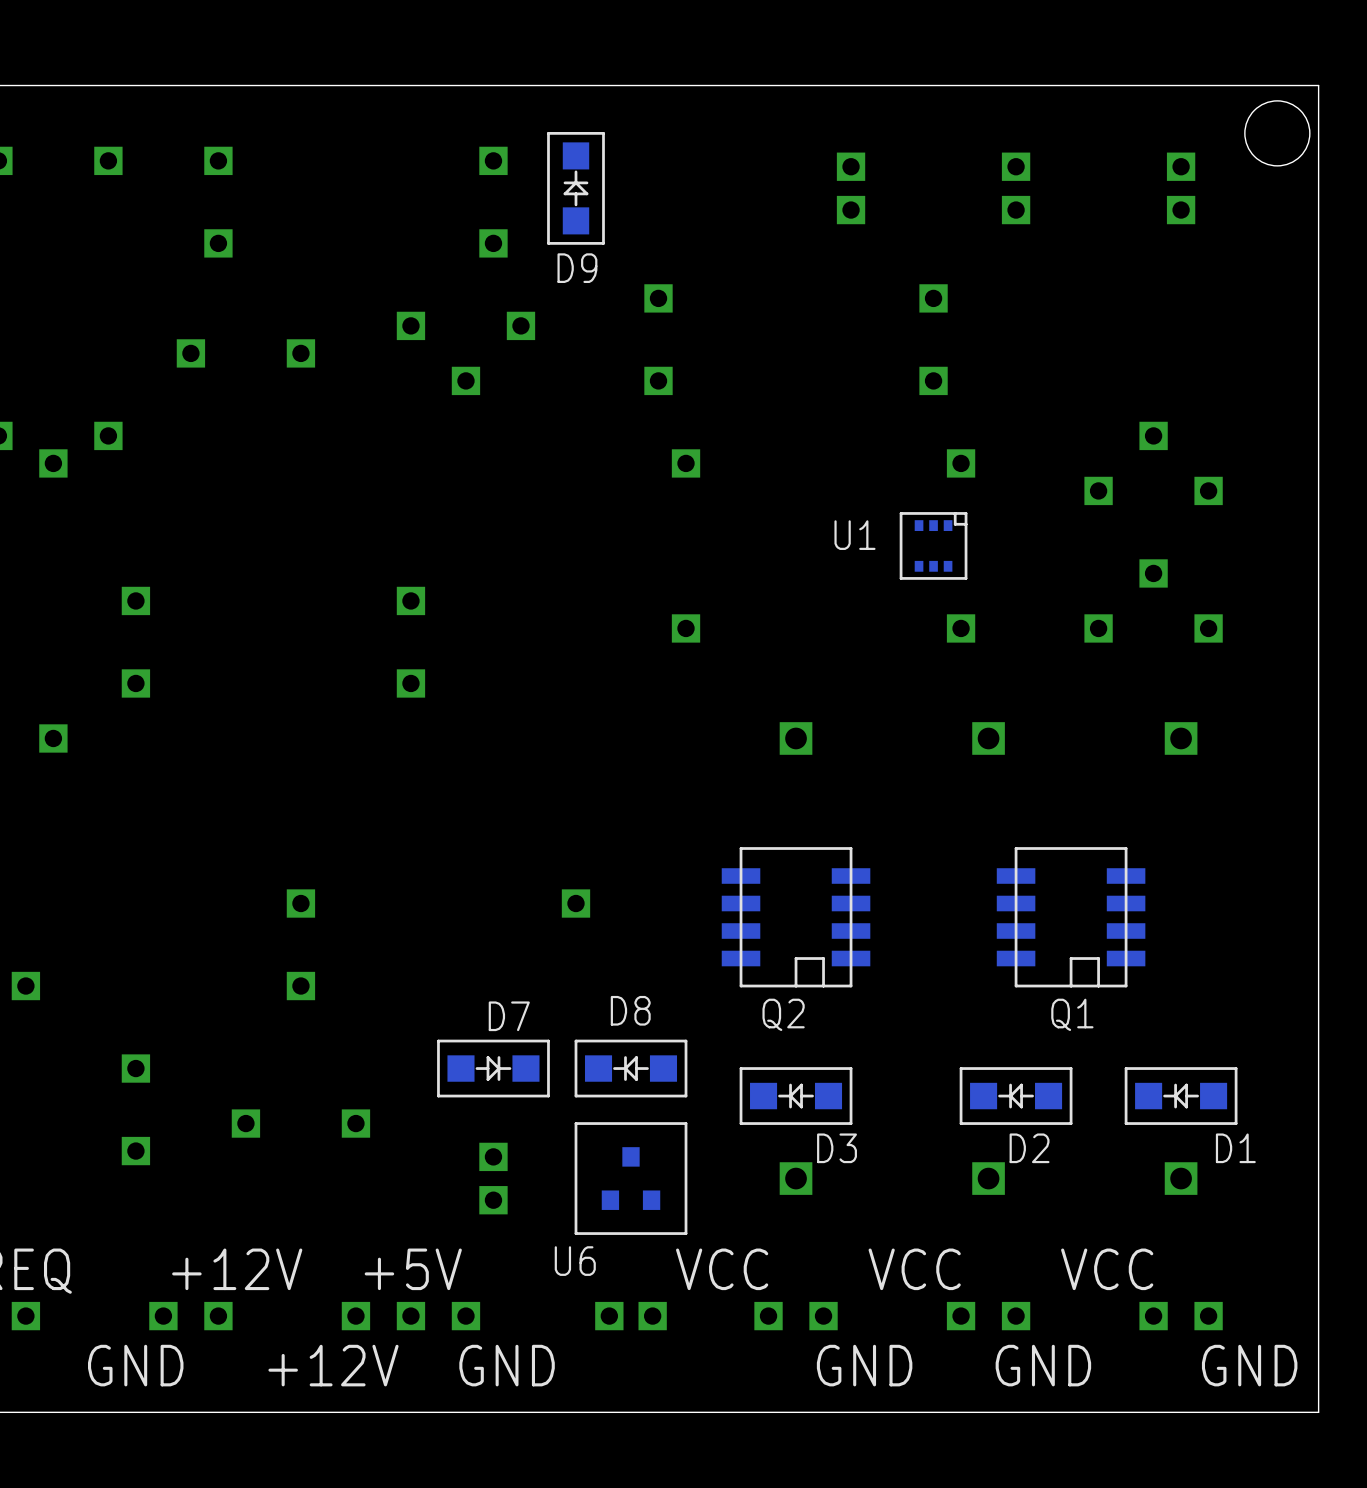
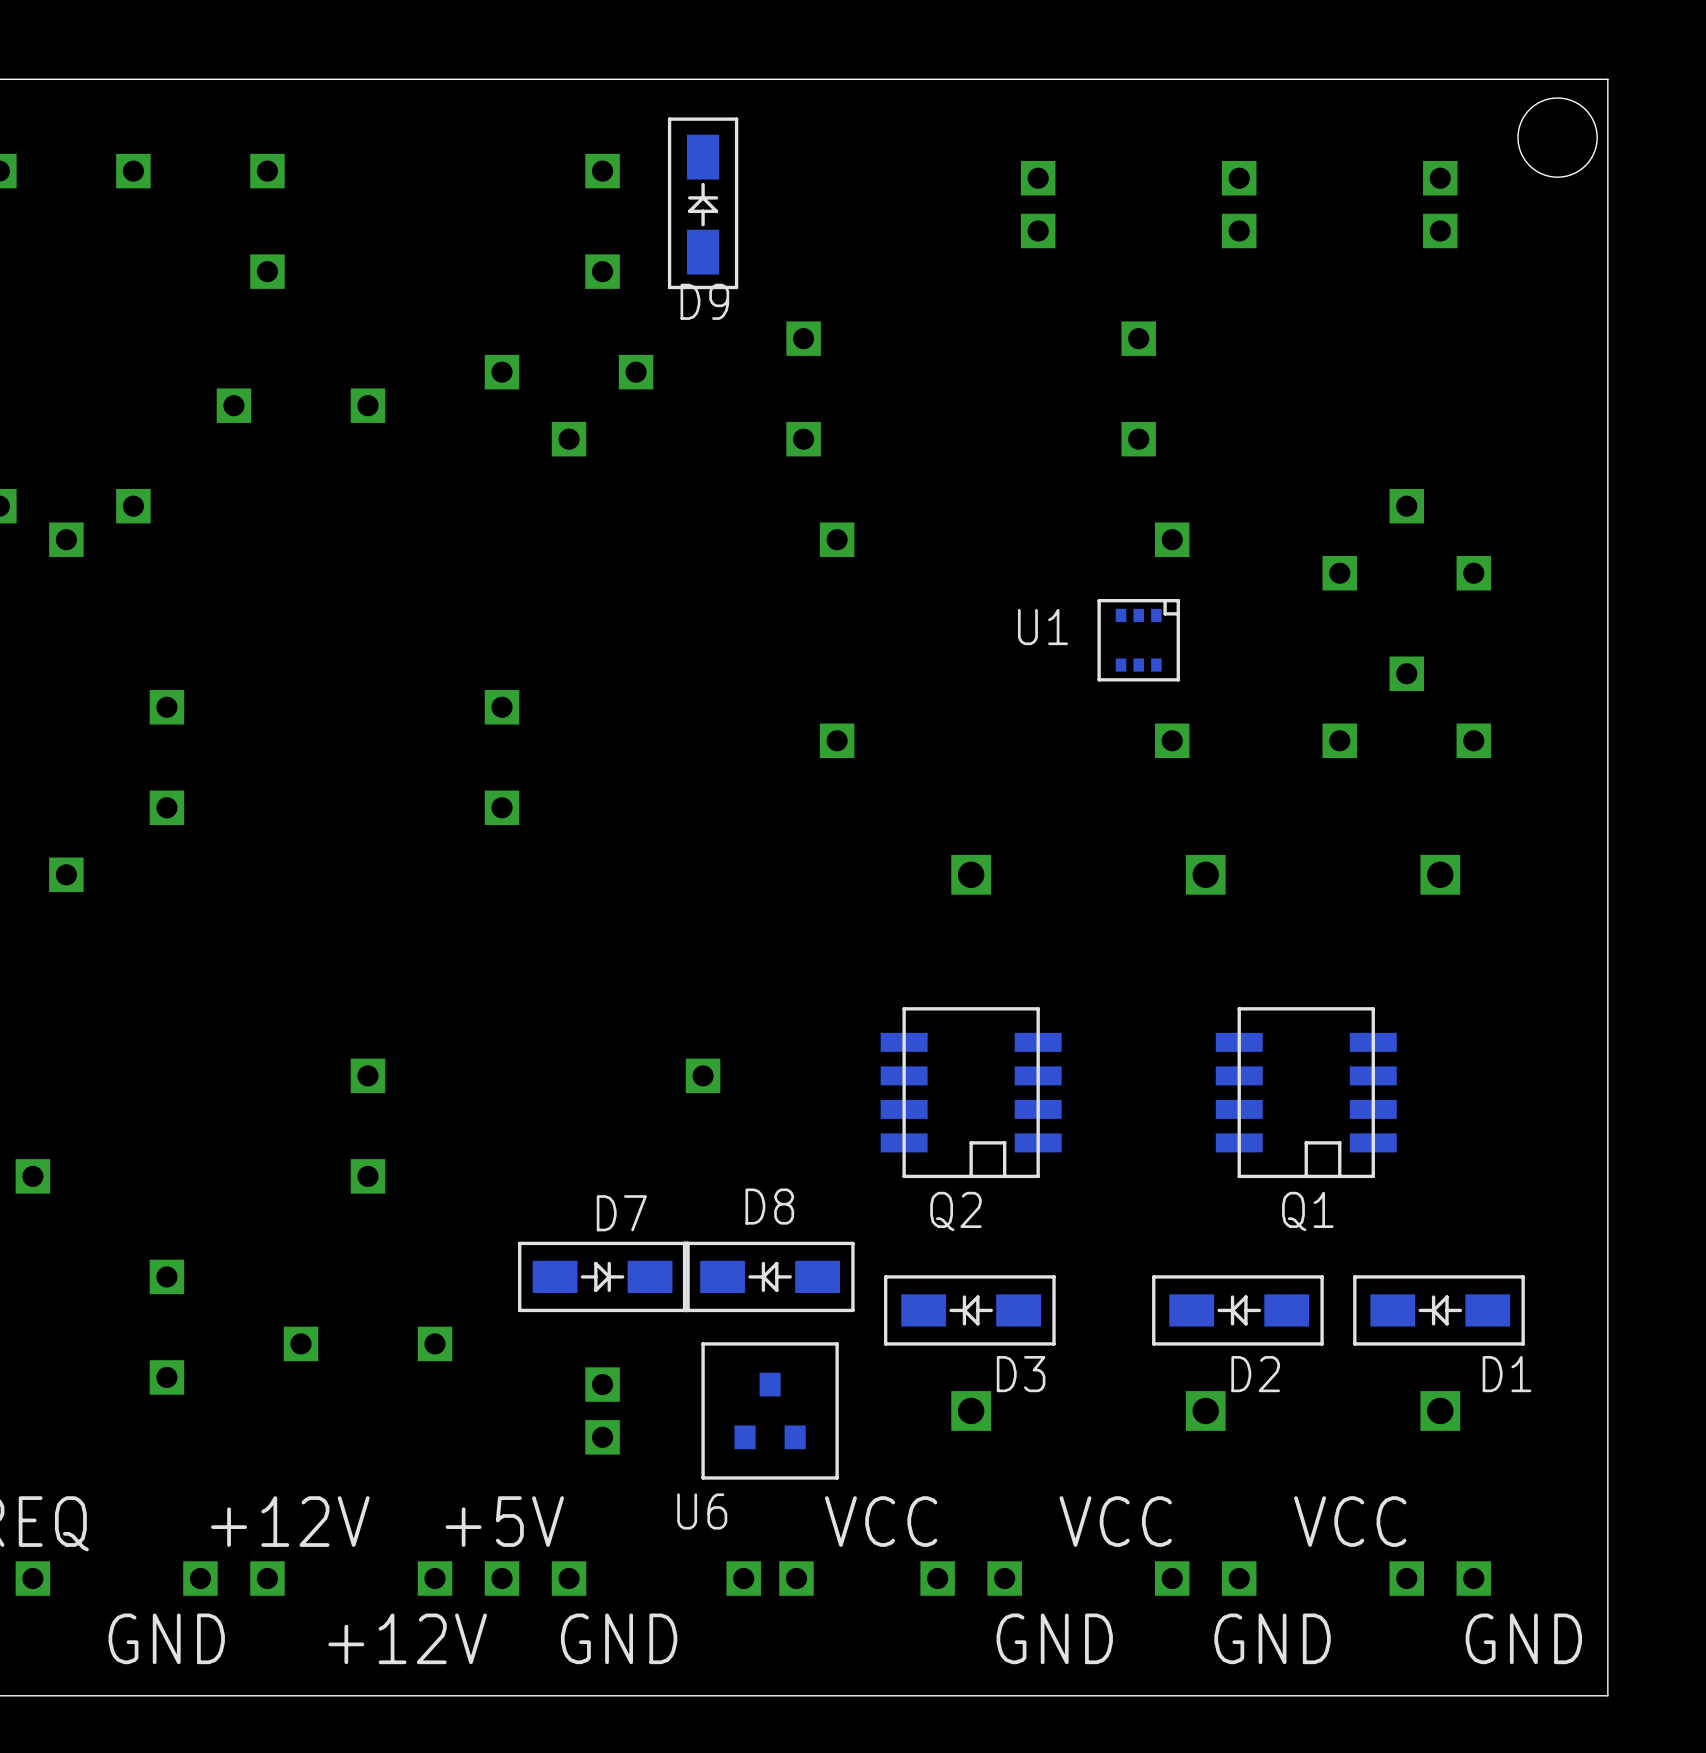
D9 footprint: [547, 132, 605, 245] -> [667, 117, 739, 290]
D7 footprint: [437, 1039, 550, 1098] -> [518, 1241, 690, 1313]
D8 footprint: [574, 1039, 688, 1098] -> [682, 1241, 855, 1313]
D3 footprint: [739, 1067, 853, 1125] -> [883, 1275, 1056, 1346]
D2 footprint: [959, 1067, 1073, 1125] -> [1152, 1275, 1324, 1346]
D1 footprint: [1124, 1067, 1238, 1125] -> [1353, 1275, 1525, 1346]

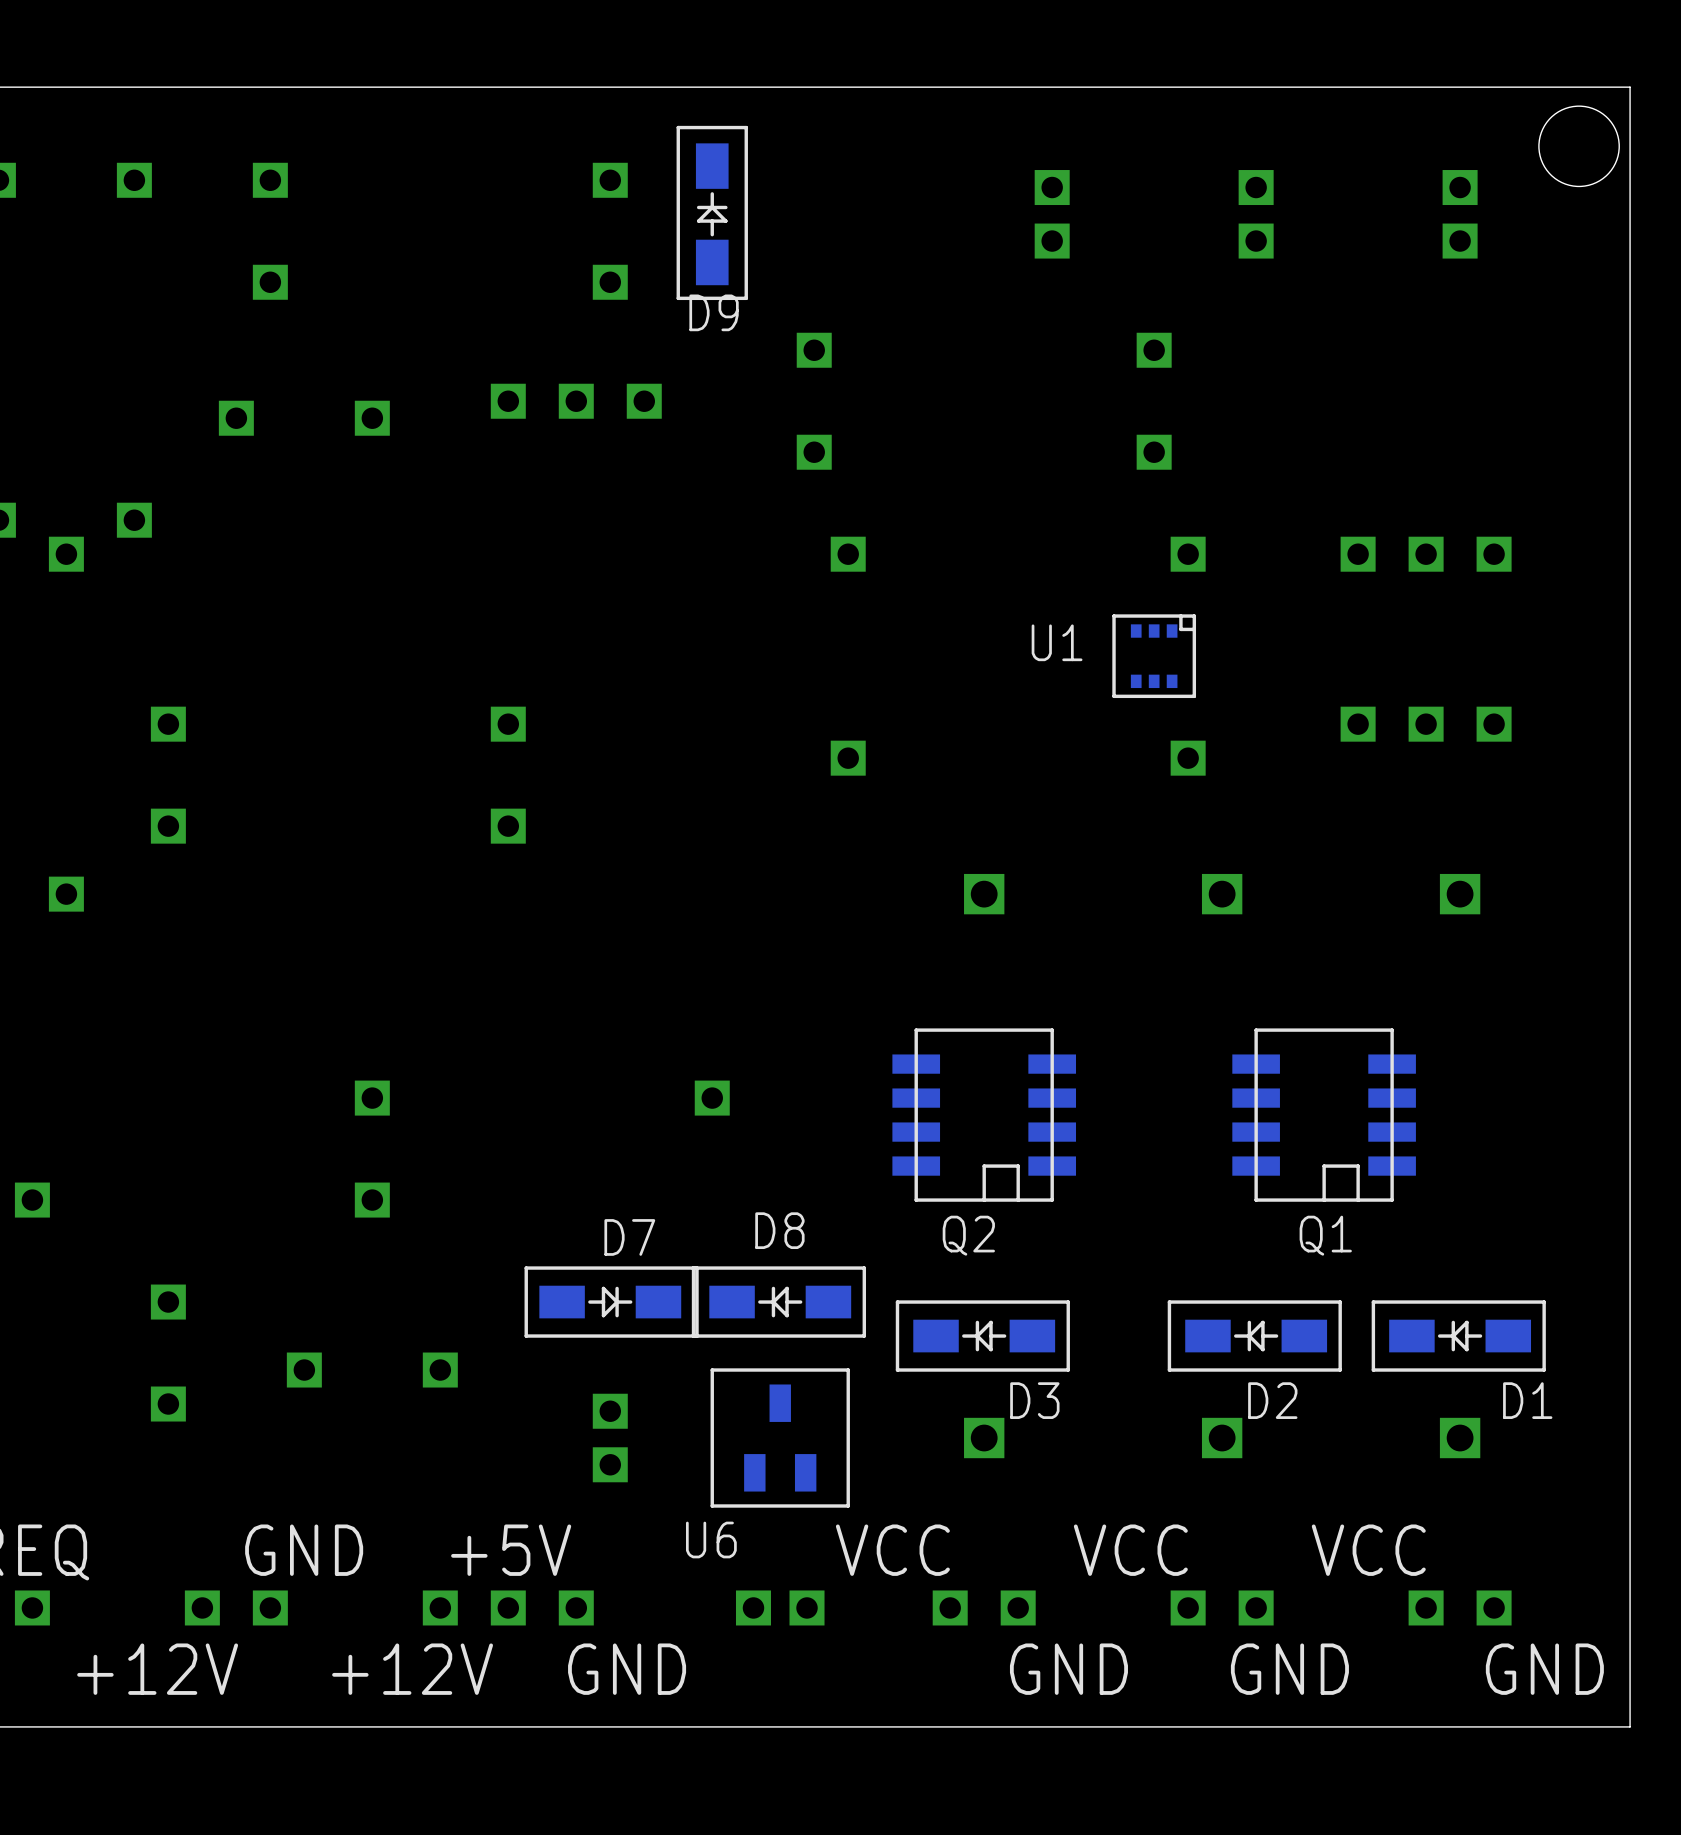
part footprint: [484, 354, 654, 457] -> [490, 383, 662, 419]
part footprint: [1322, 488, 1492, 591] -> [1340, 536, 1512, 572]
part footprint: [1322, 656, 1492, 759] -> [1340, 706, 1512, 742]
U6 footprint: [701, 1342, 839, 1480] -> [710, 1368, 850, 1508]
text position: +12V (290, 1521) -> +12V (157, 1669)
text position: GND (166, 1638) -> GND (304, 1550)

